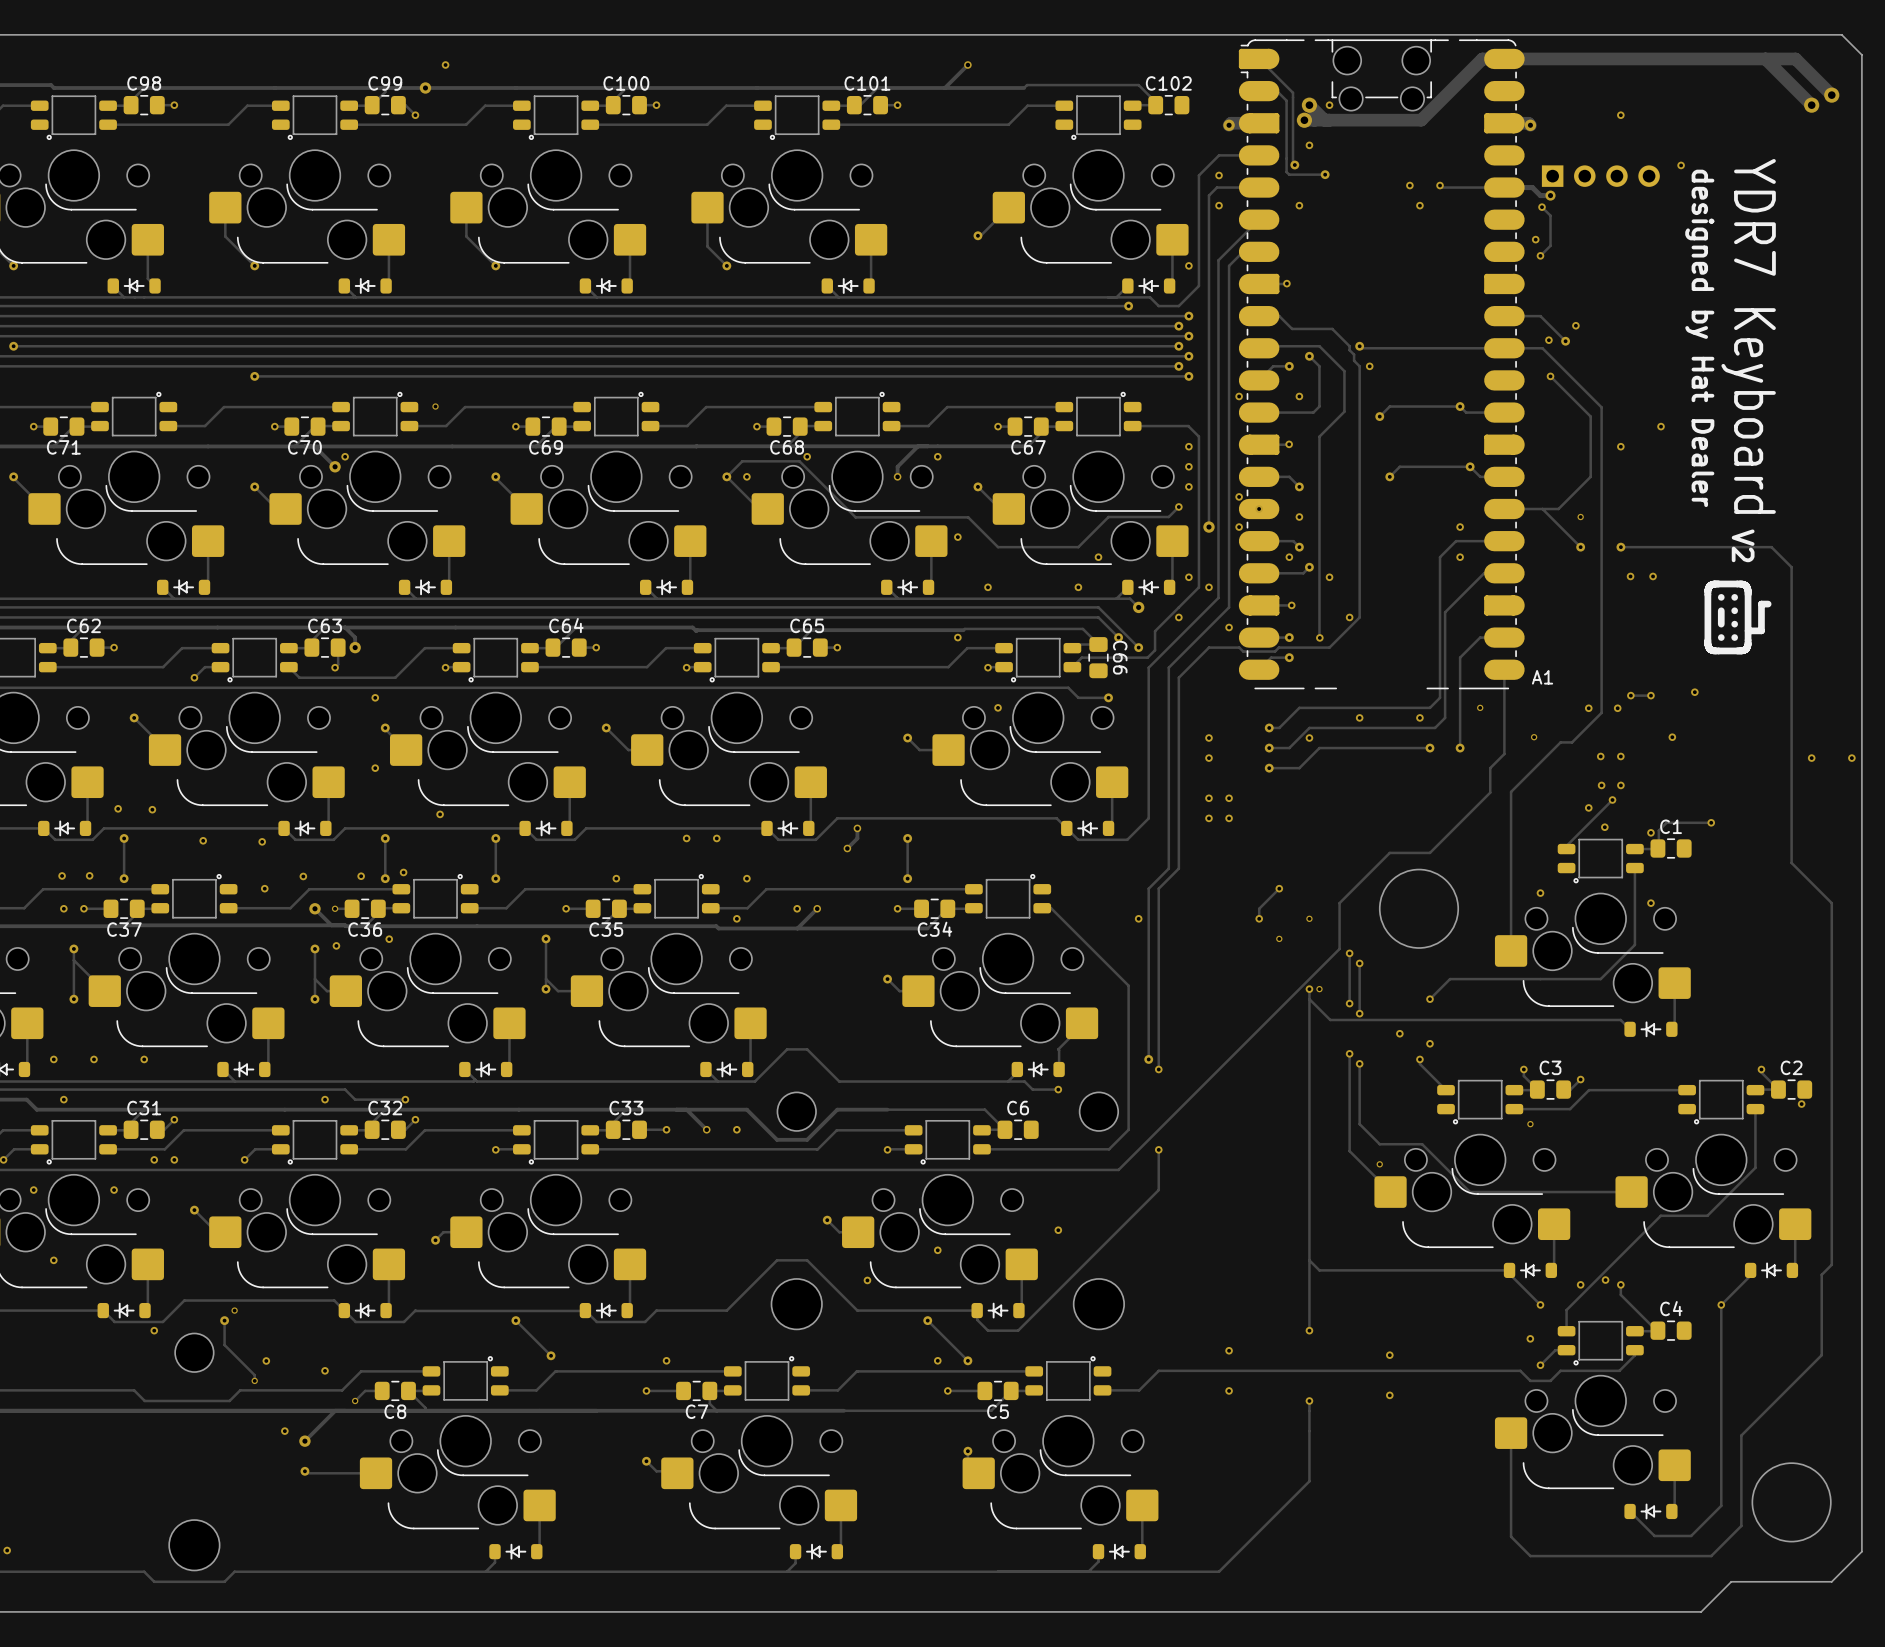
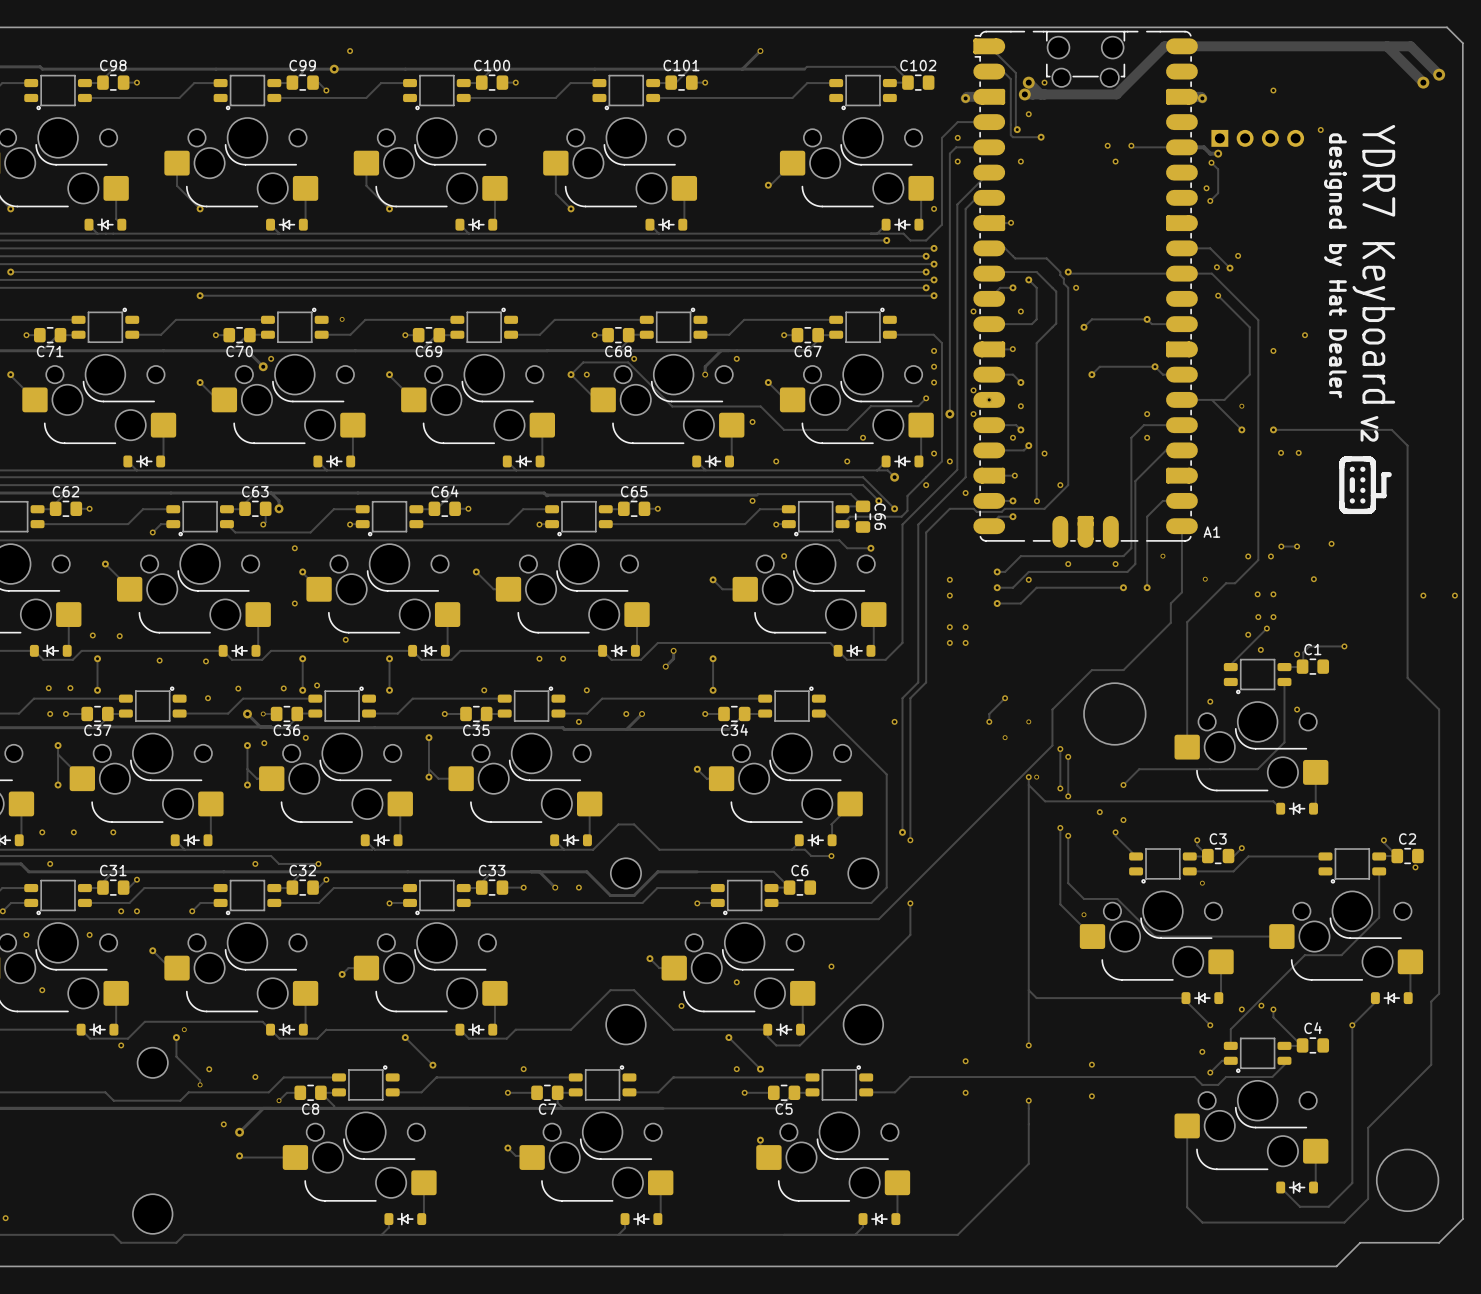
A1 footprint: [1238, 39, 1525, 690] -> [973, 31, 1198, 548]

